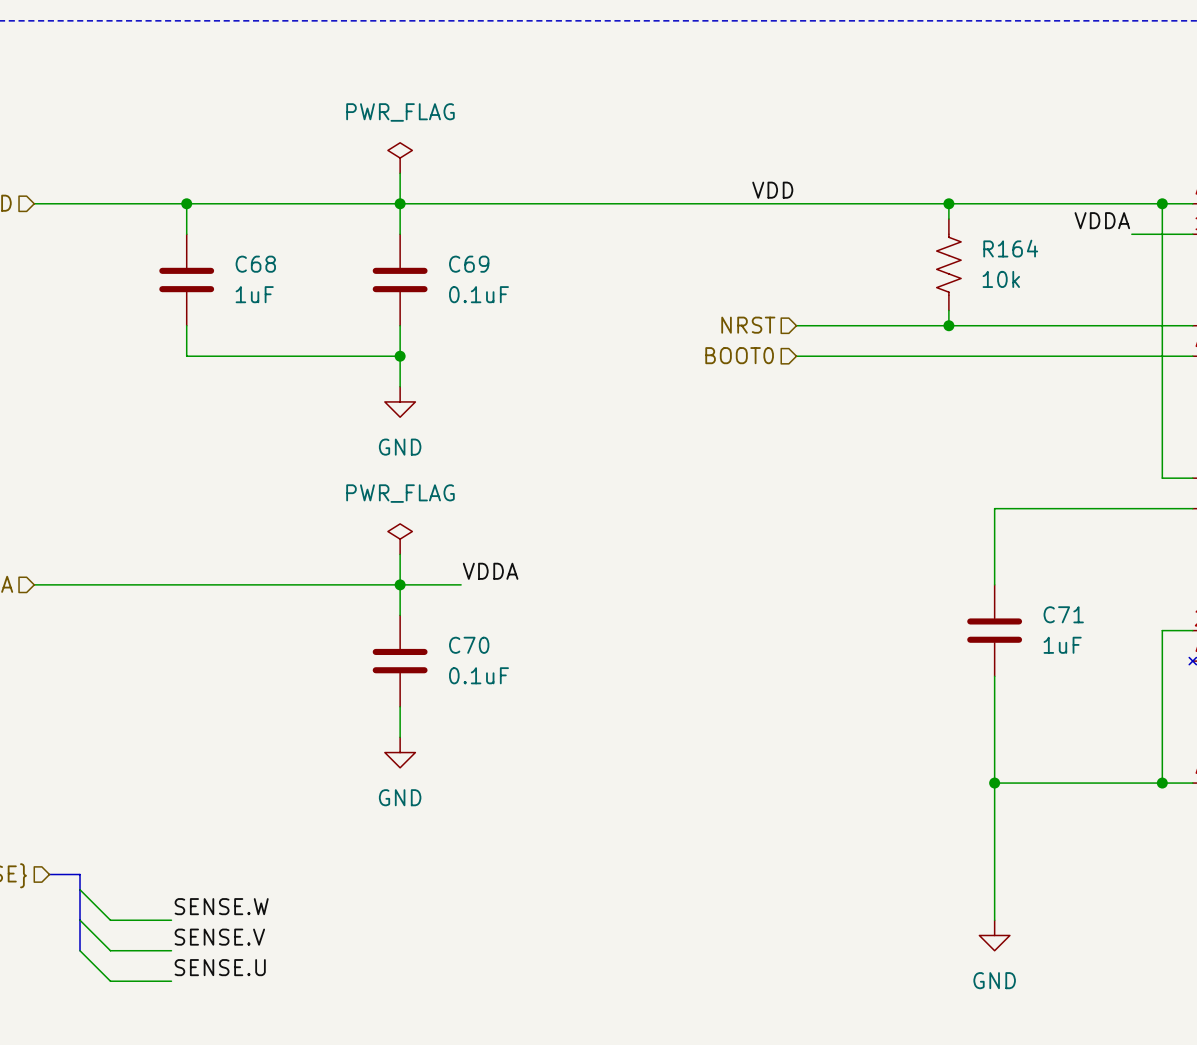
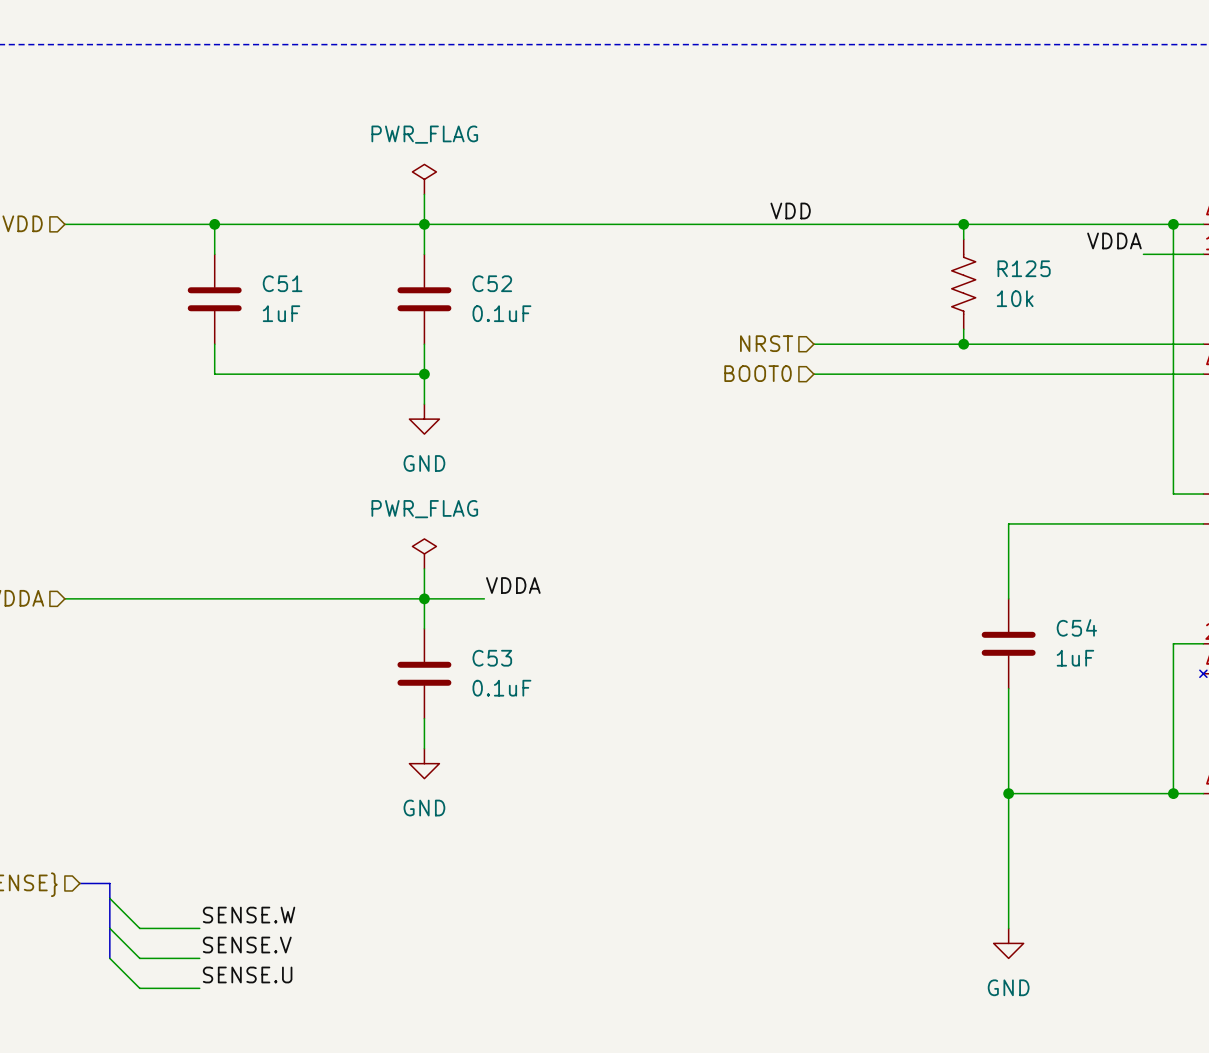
R164 name: R164 (1010, 248) -> R125 (1024, 268)
C68 name: C68 (255, 264) -> C51 (282, 283)
C69 name: C69 (469, 264) -> C52 (492, 283)
C71 name: C71 (1063, 614) -> C54 (1076, 627)
C70 name: C70 (469, 645) -> C53 (492, 658)

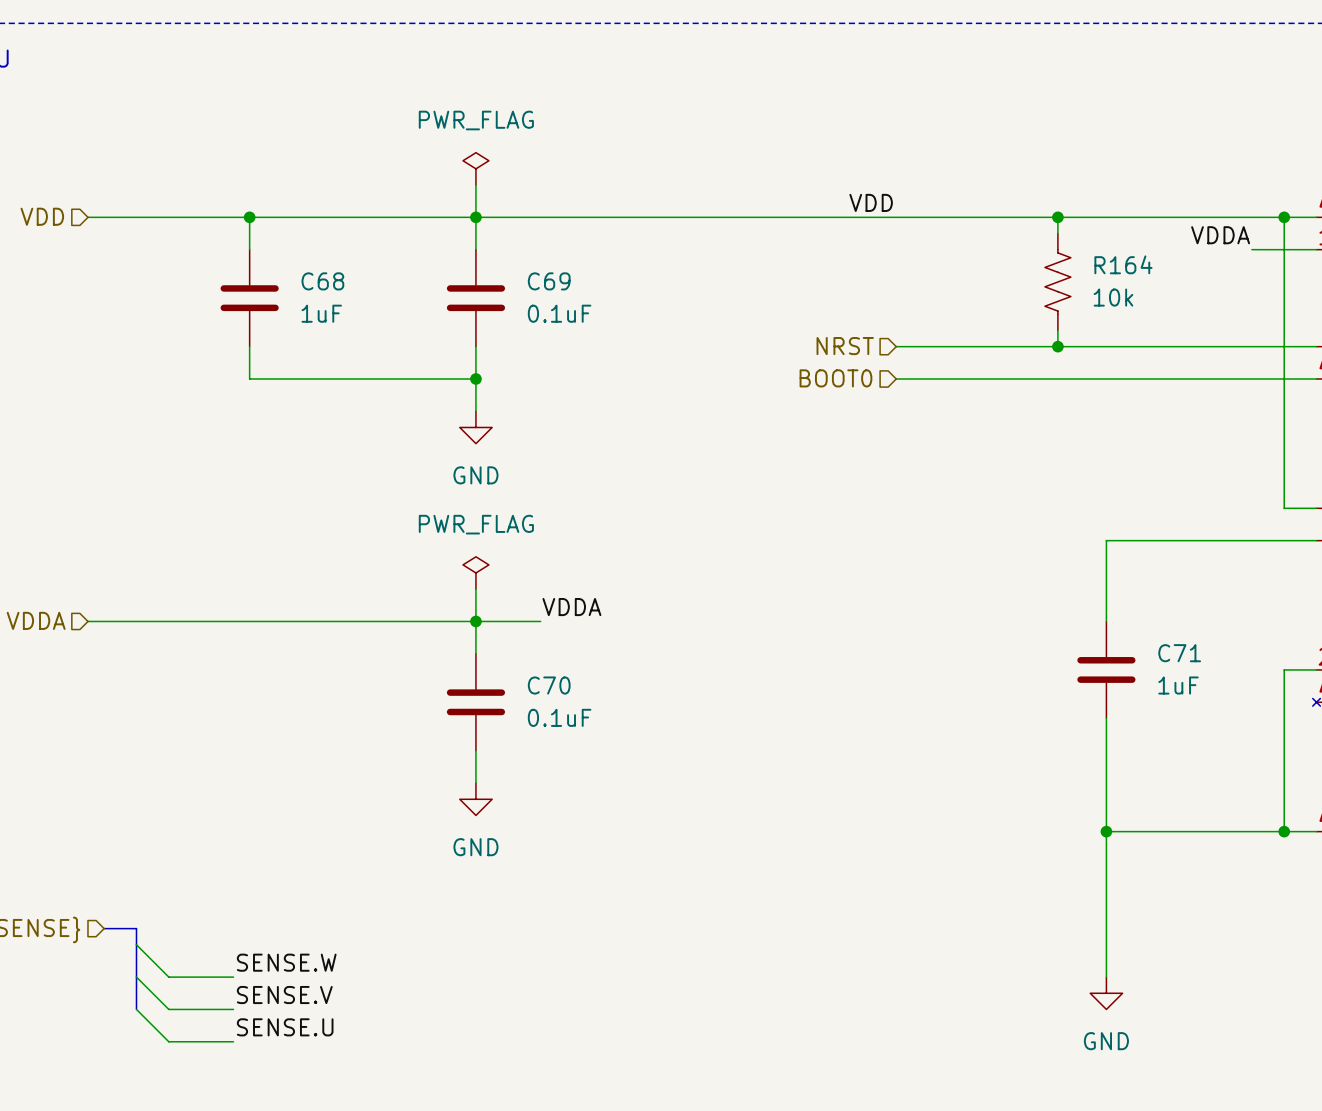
R125 name: R125 (1024, 268) -> R164 (1123, 264)
C51 name: C51 (282, 283) -> C68 (322, 281)
C52 name: C52 (492, 283) -> C69 (549, 281)
C54 name: C54 (1076, 627) -> C71 (1179, 653)
C53 name: C53 (492, 658) -> C70 (549, 685)

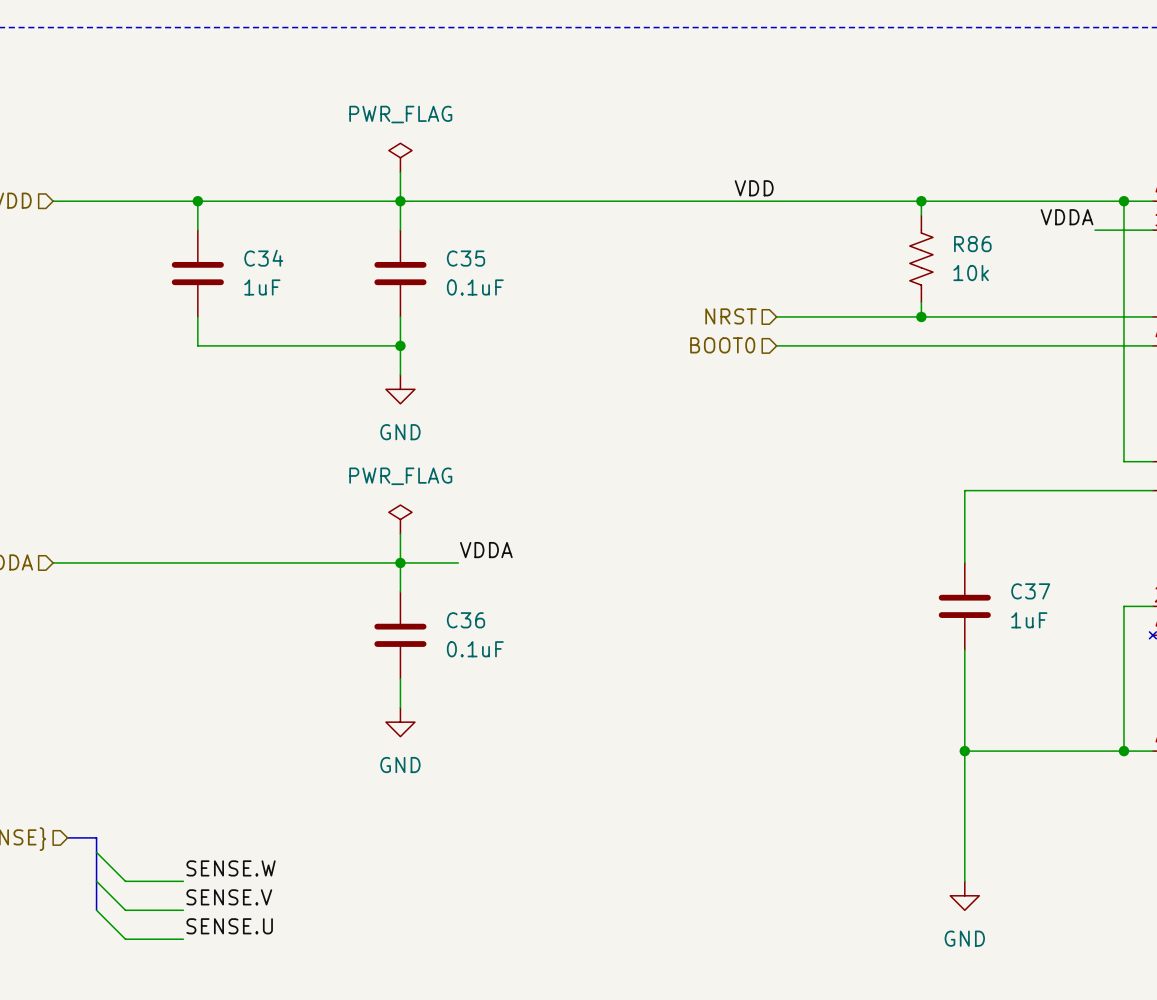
R164 name: R164 (1123, 264) -> R86 (972, 244)
C68 name: C68 (322, 281) -> C34 (263, 258)
C69 name: C69 (549, 281) -> C35 (466, 258)
C71 name: C71 (1179, 653) -> C37 (1030, 591)
C70 name: C70 (549, 685) -> C36 (466, 620)

